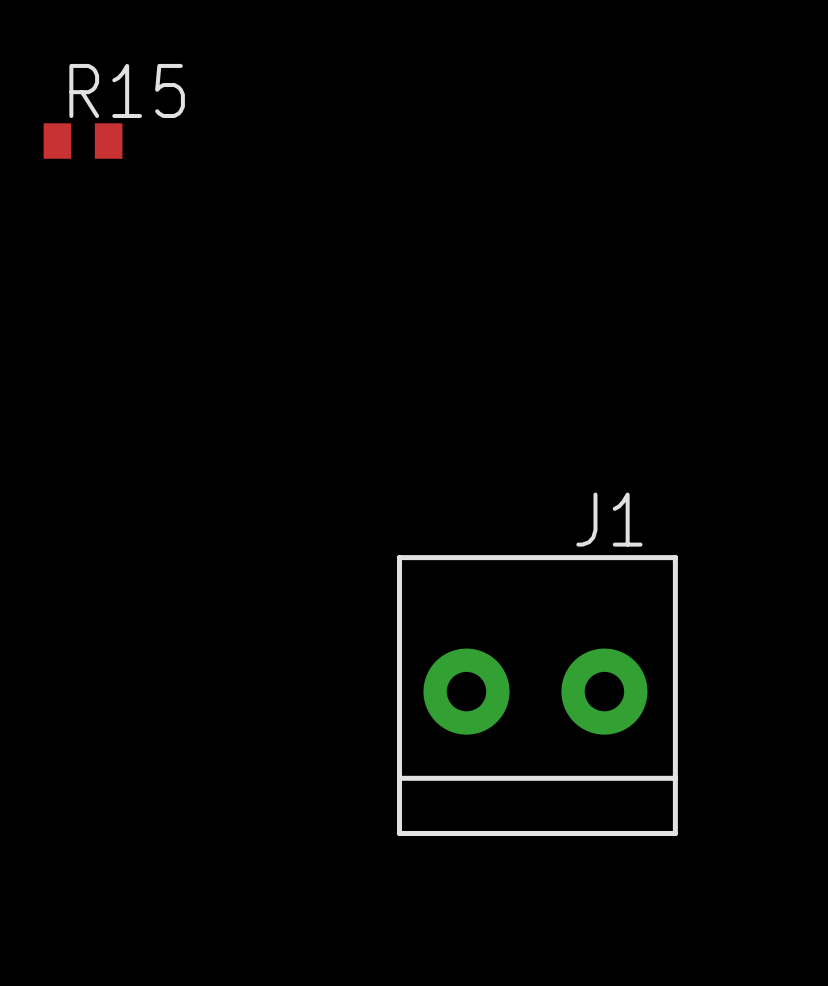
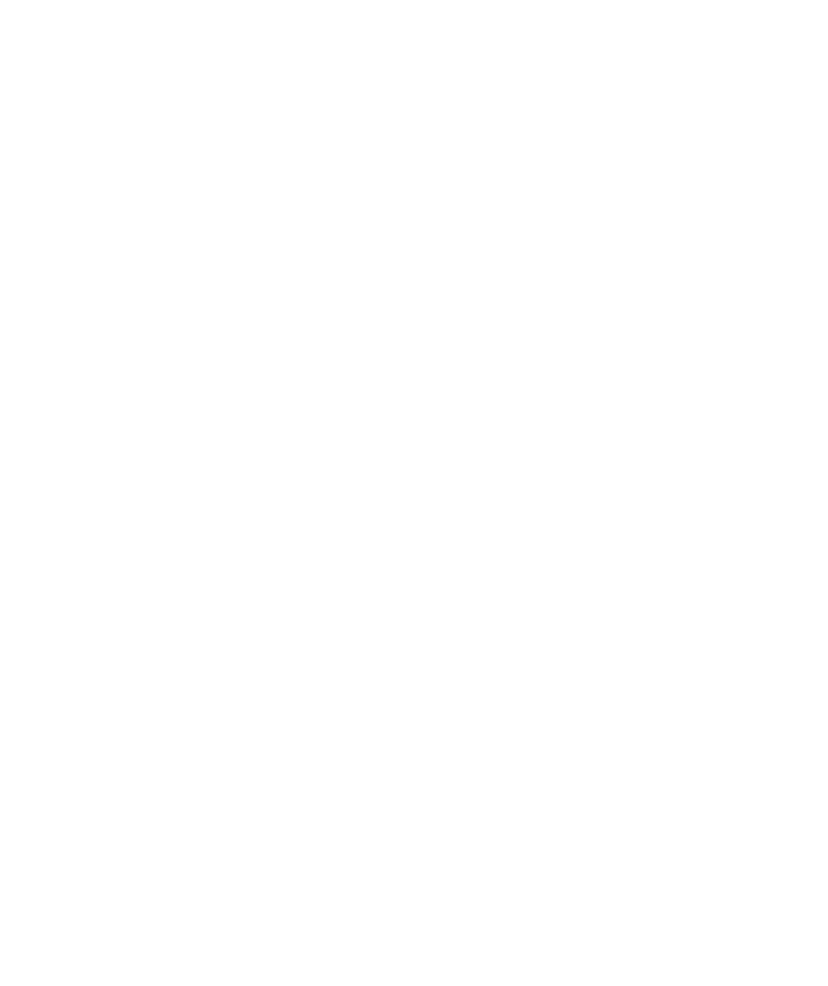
R15: (83, 141) -> none
J1: (537, 695) -> none

